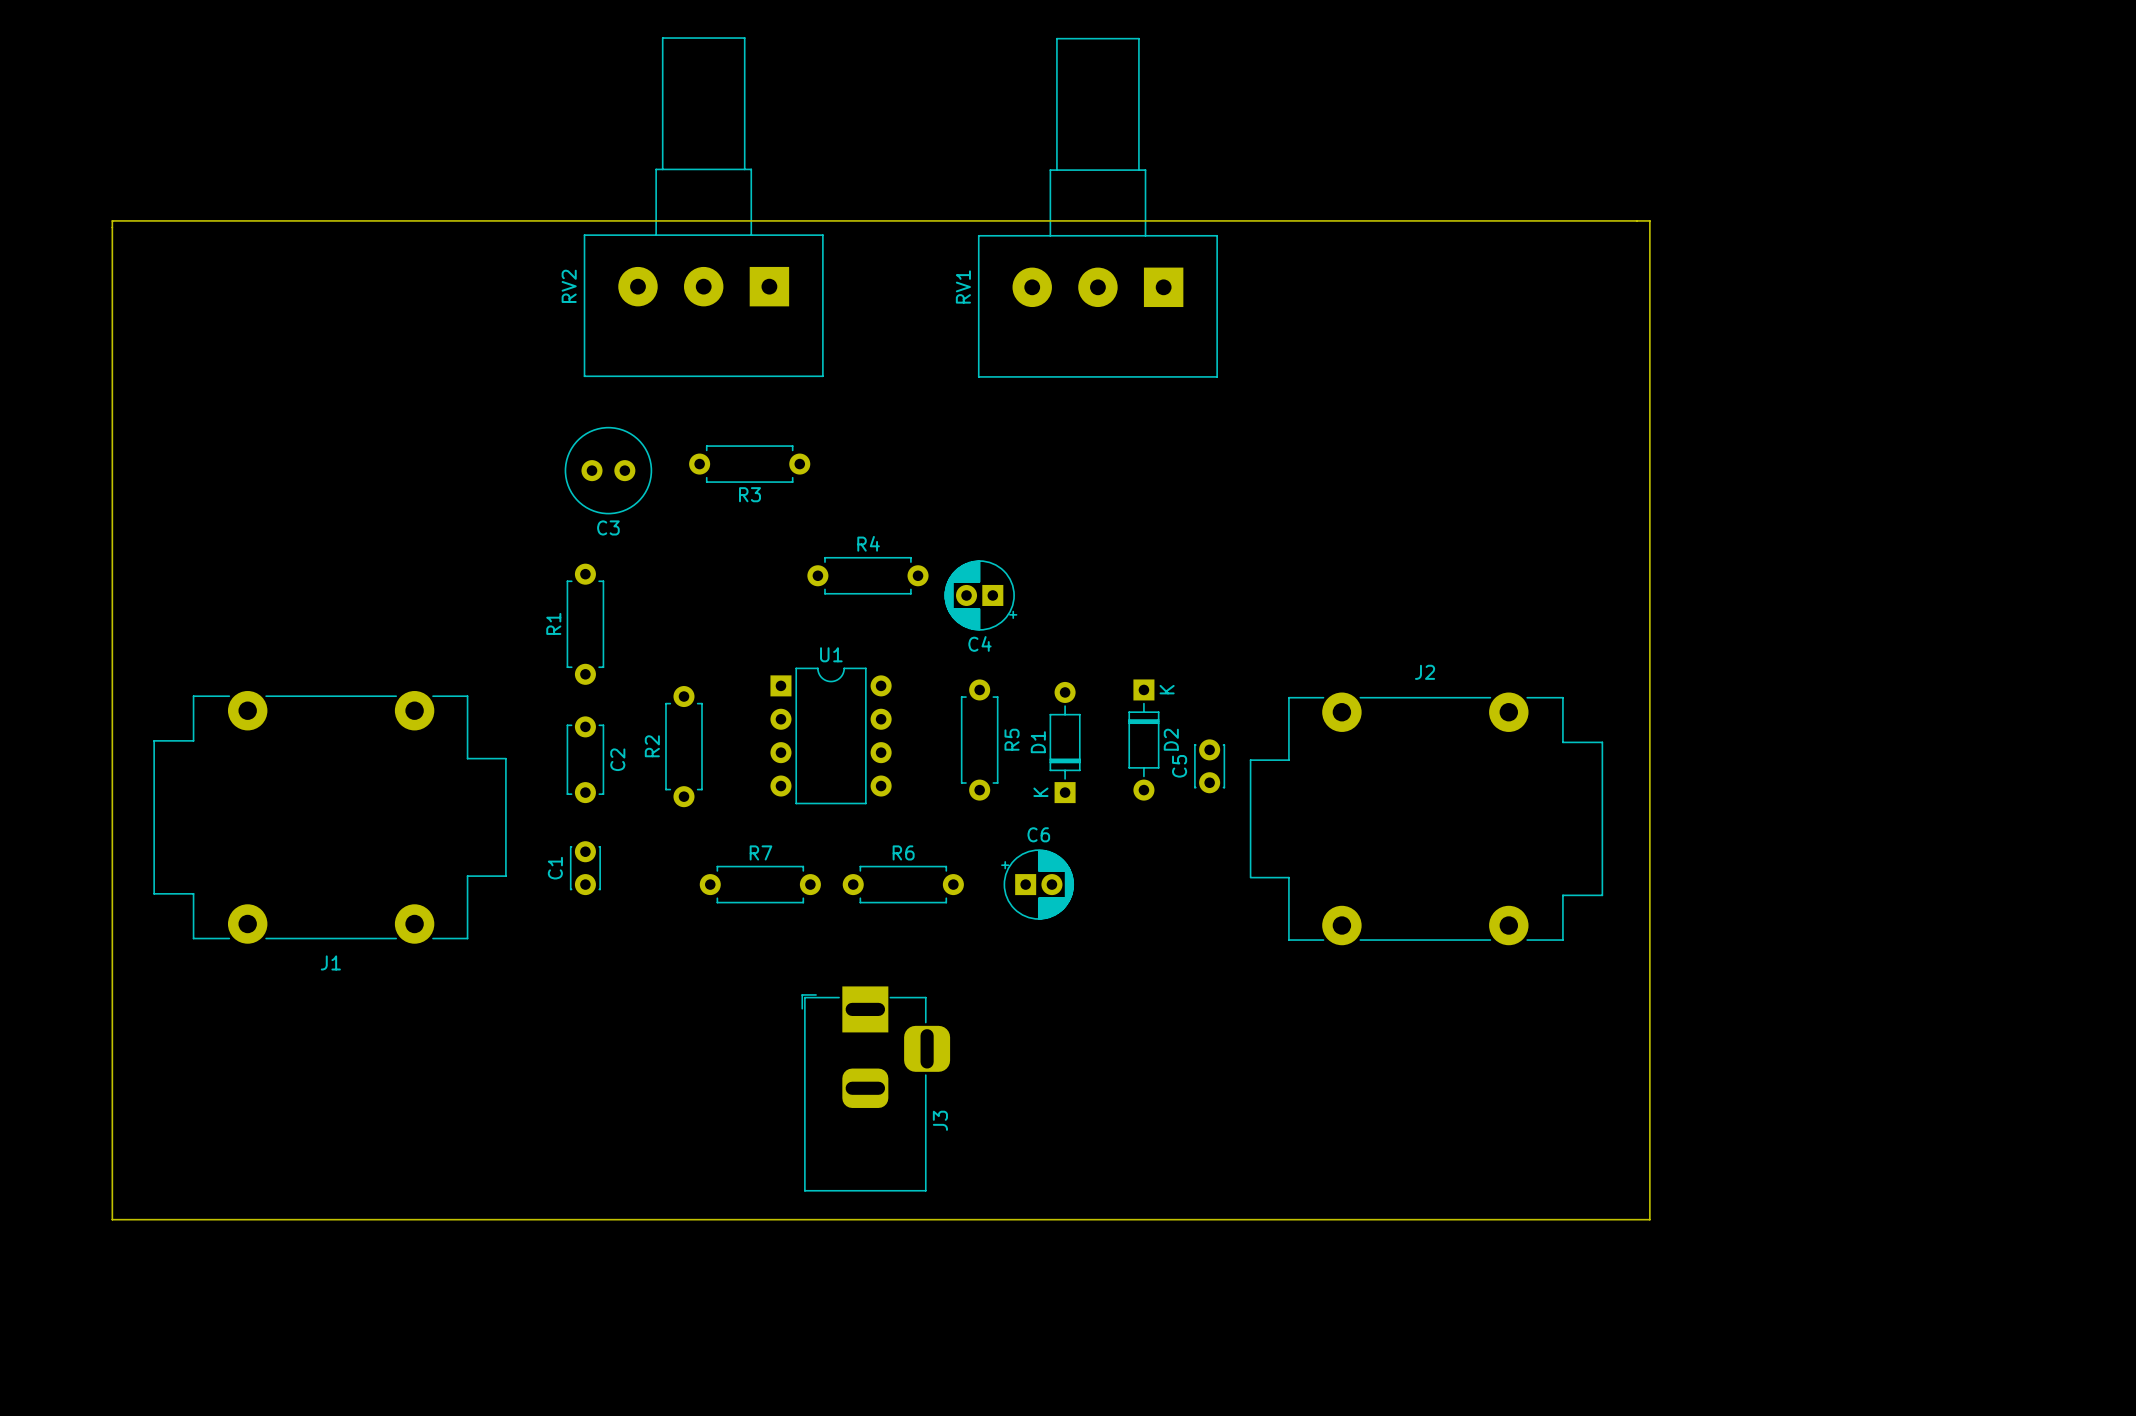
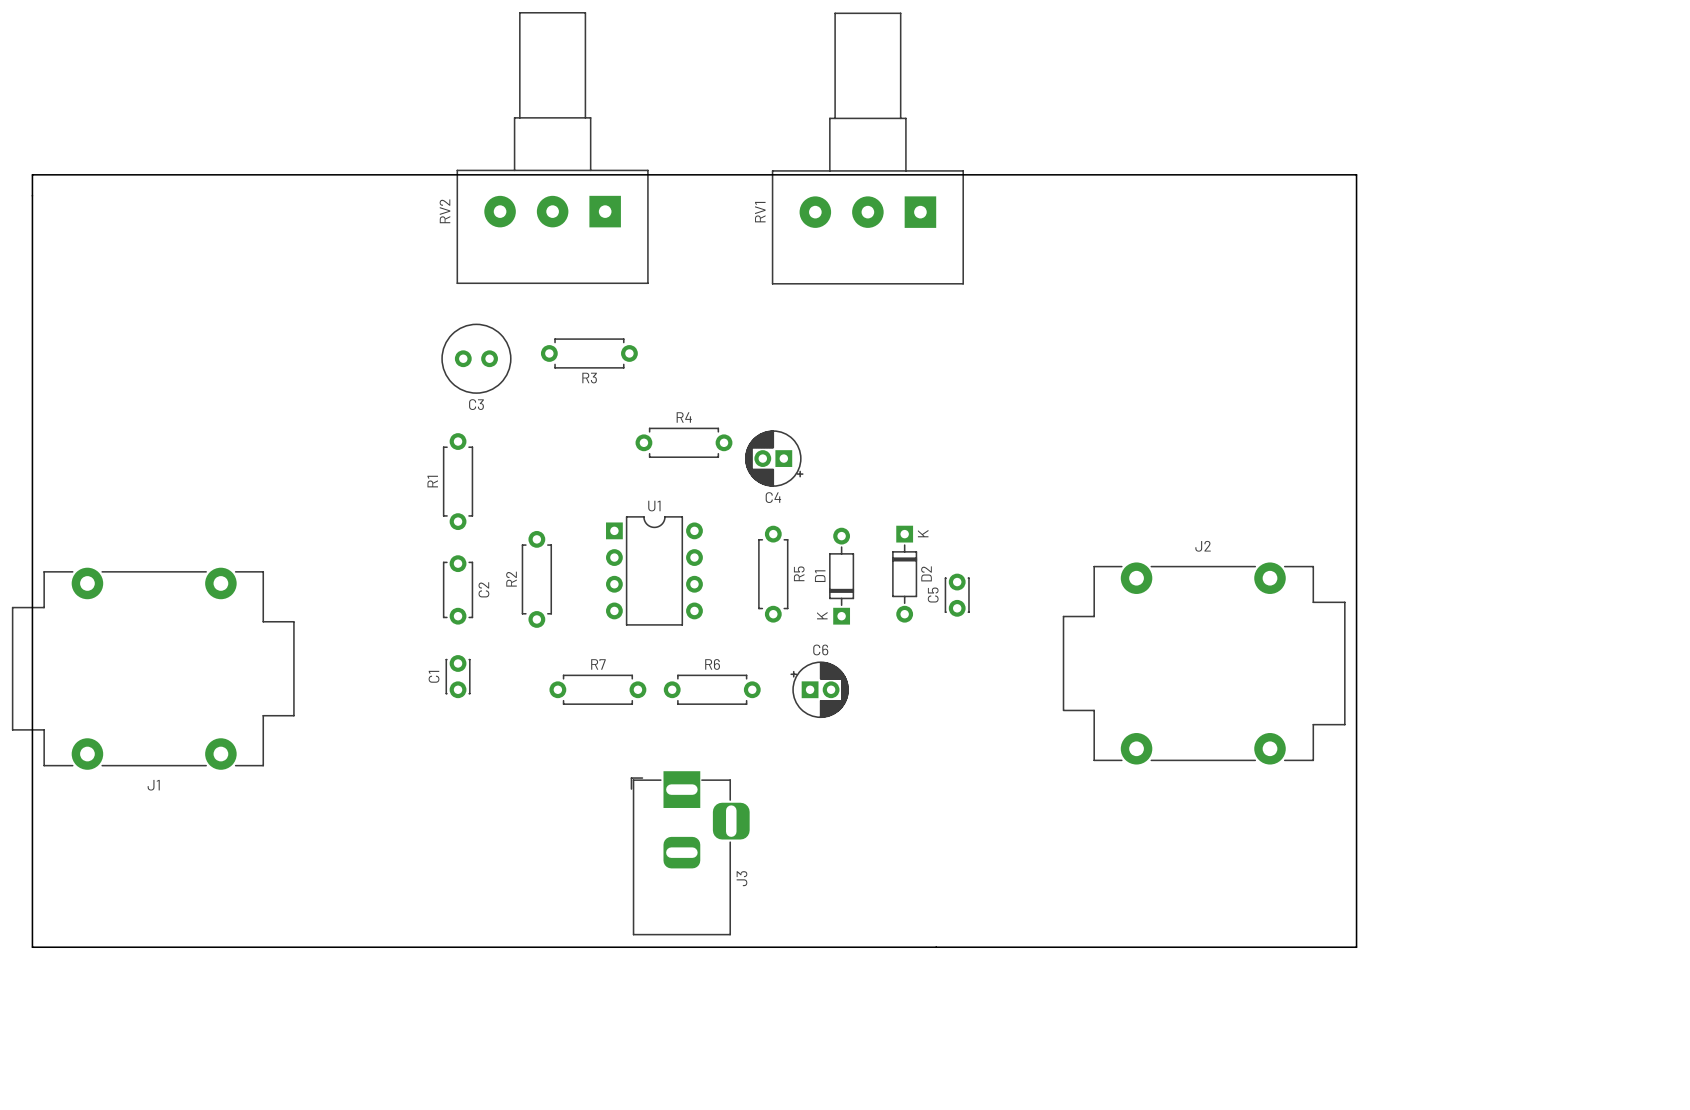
board edge: (112, 220) (112, 1219) (1649, 1219) (1649, 220) (112, 220) -> (32, 174) (32, 947) (1356, 947) (1356, 174) (32, 174)
J1 position: (330, 817) -> (153, 668)
J2 position: (1426, 818) -> (1204, 663)

